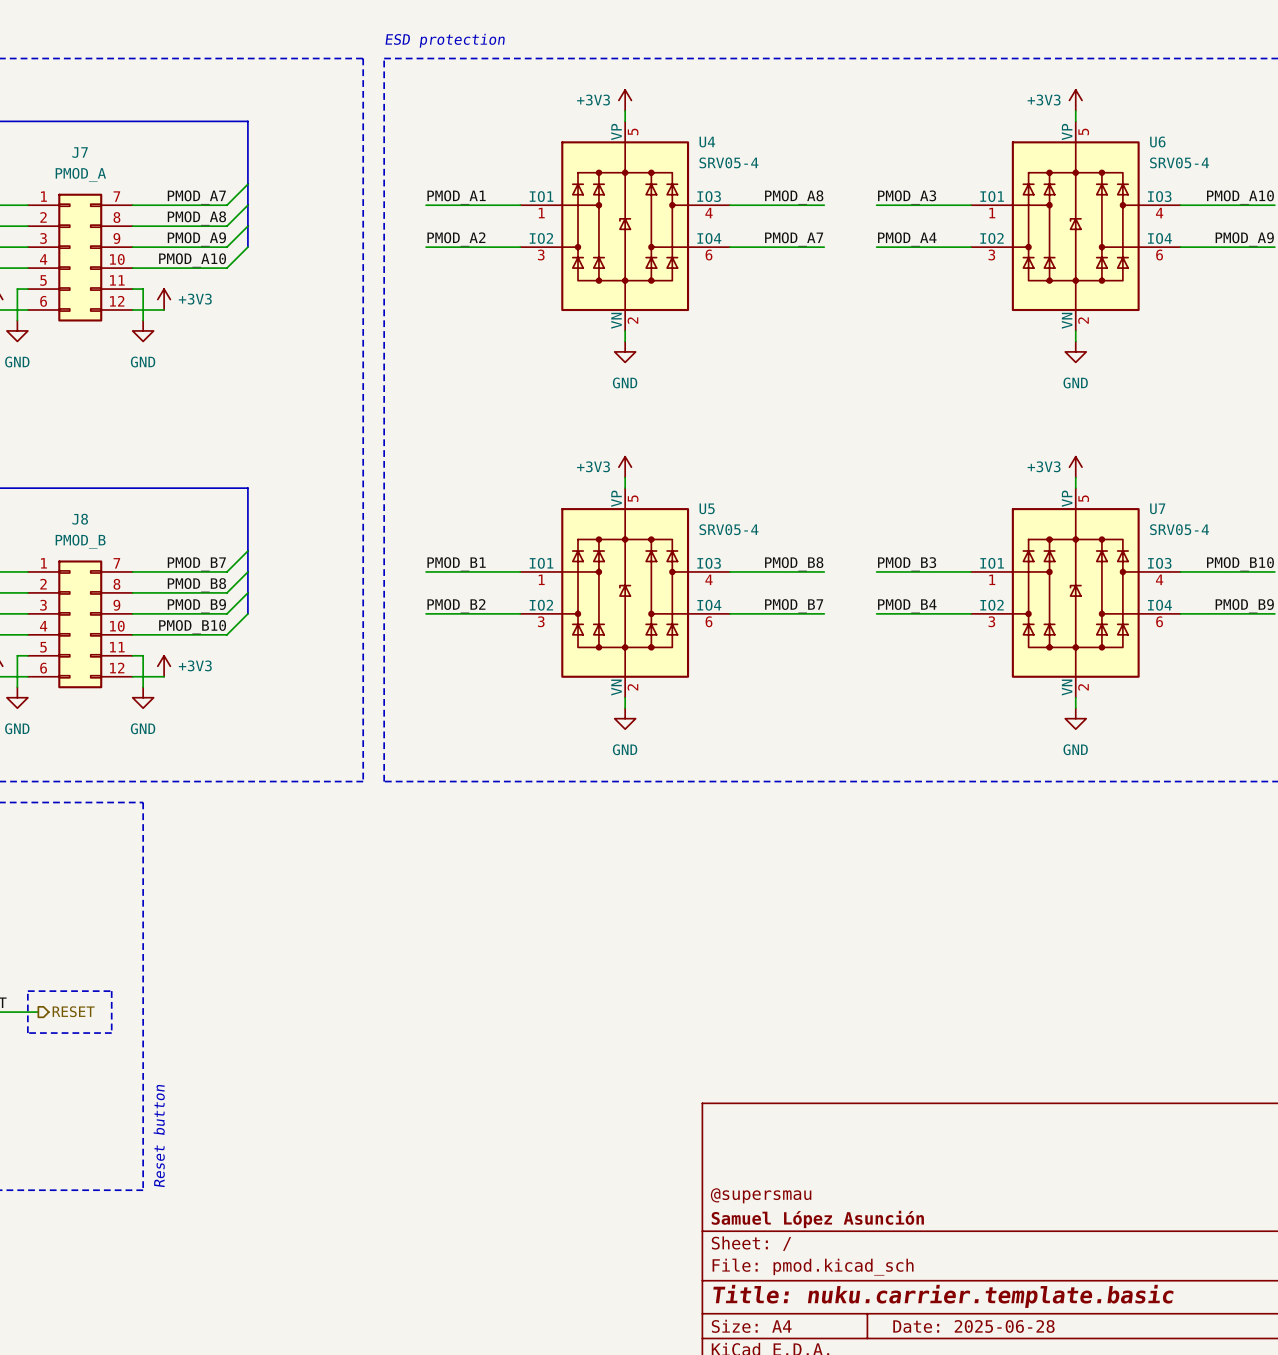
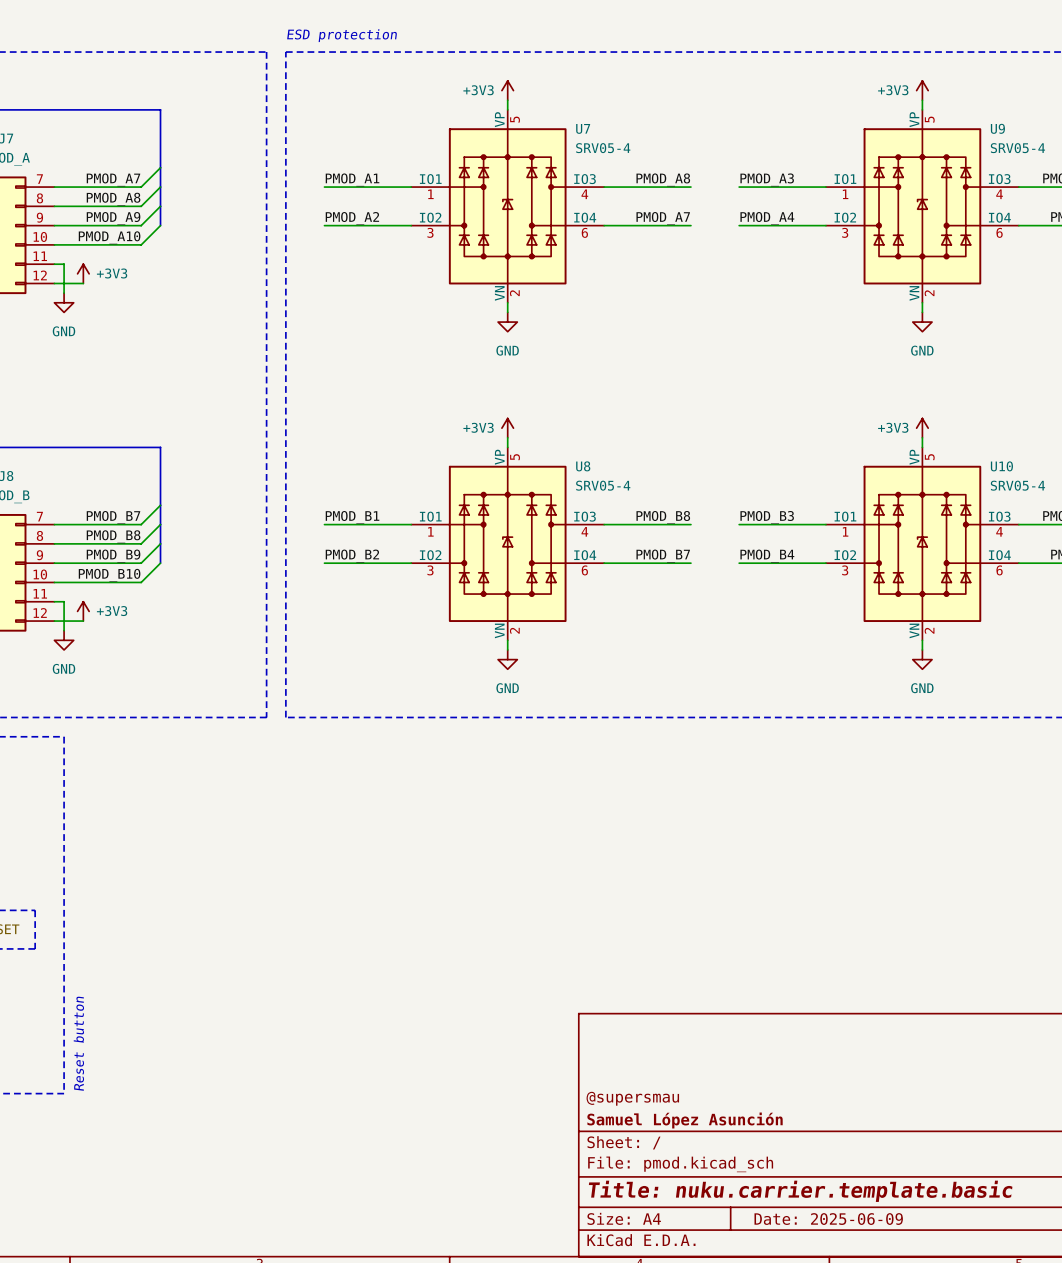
U6 name: U6 (1157, 141) -> U9 (997, 128)
U4 name: U4 (707, 142) -> U7 (583, 128)
U5 name: U5 (707, 508) -> U8 (583, 466)
U7 name: U7 (1157, 508) -> U10 (1001, 466)
title block: Date: 2025-06-28 (973, 1326) -> Date: 2025-06-09 (828, 1219)

